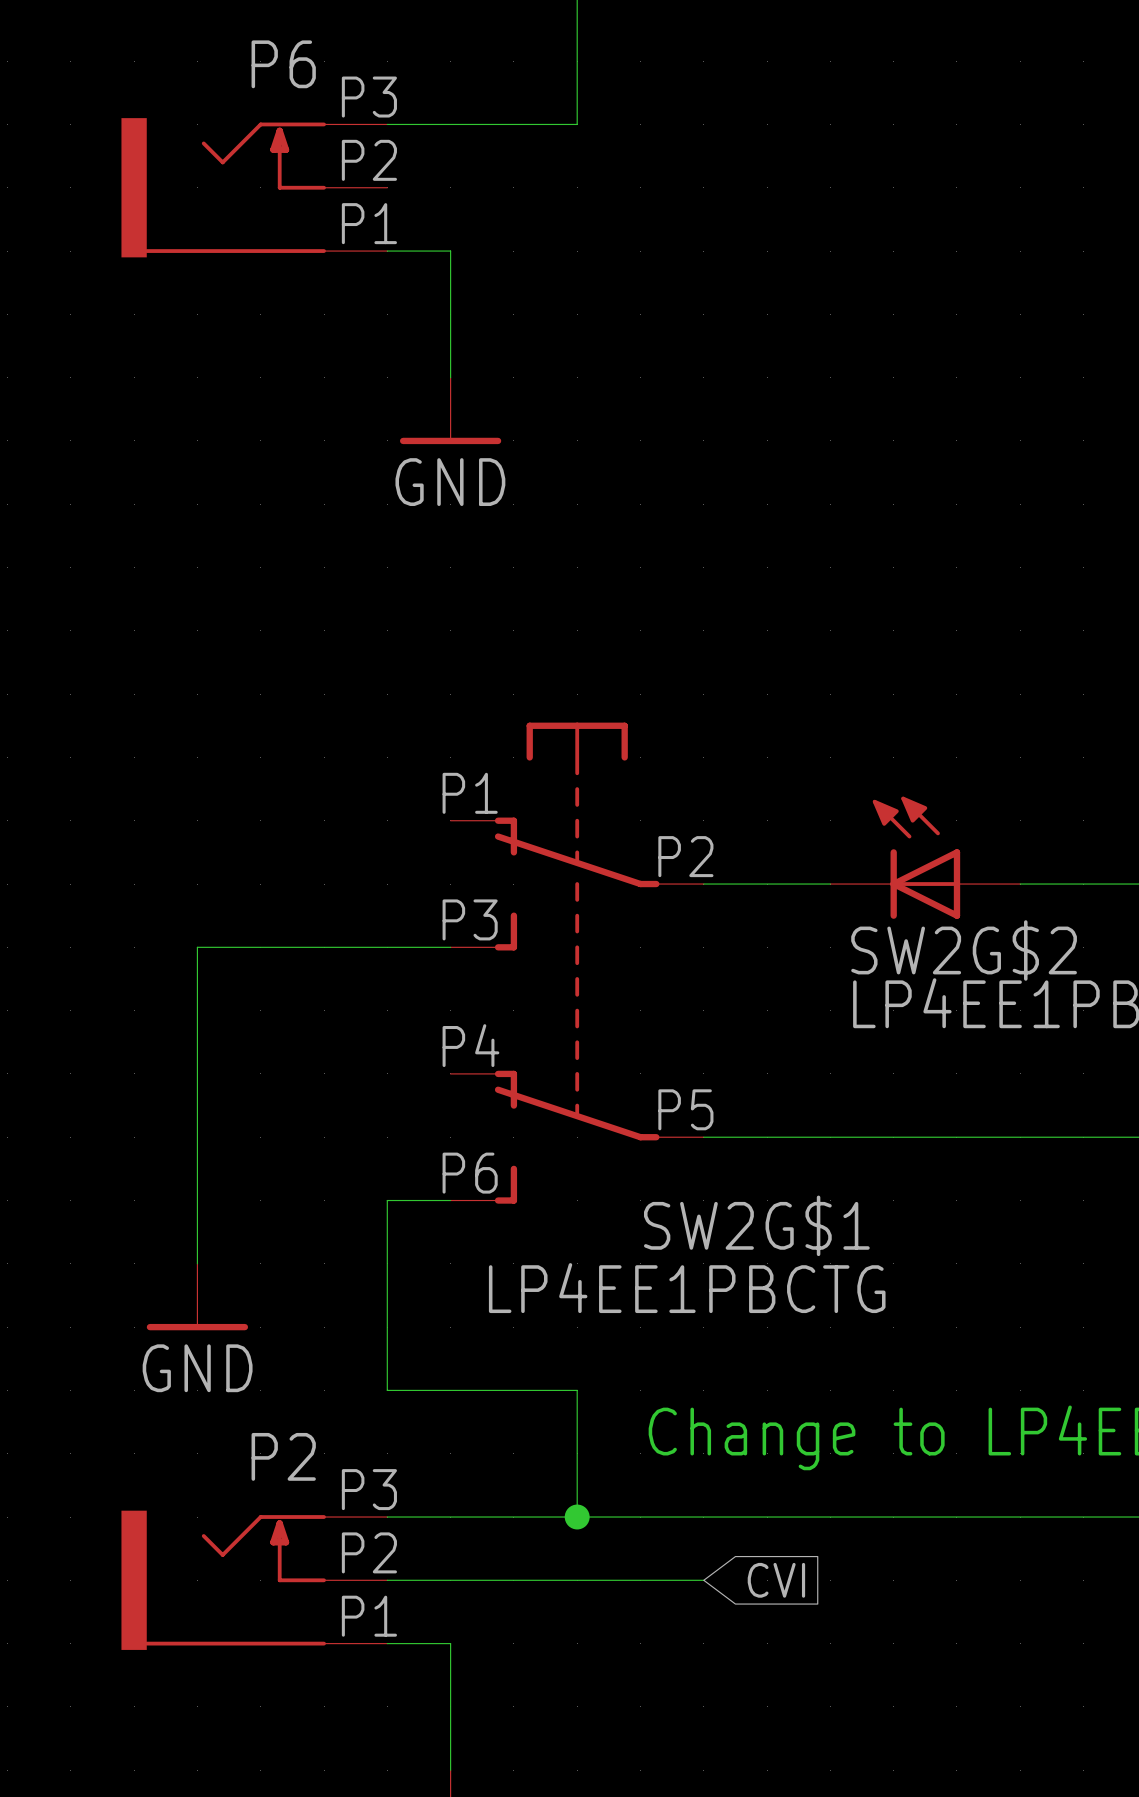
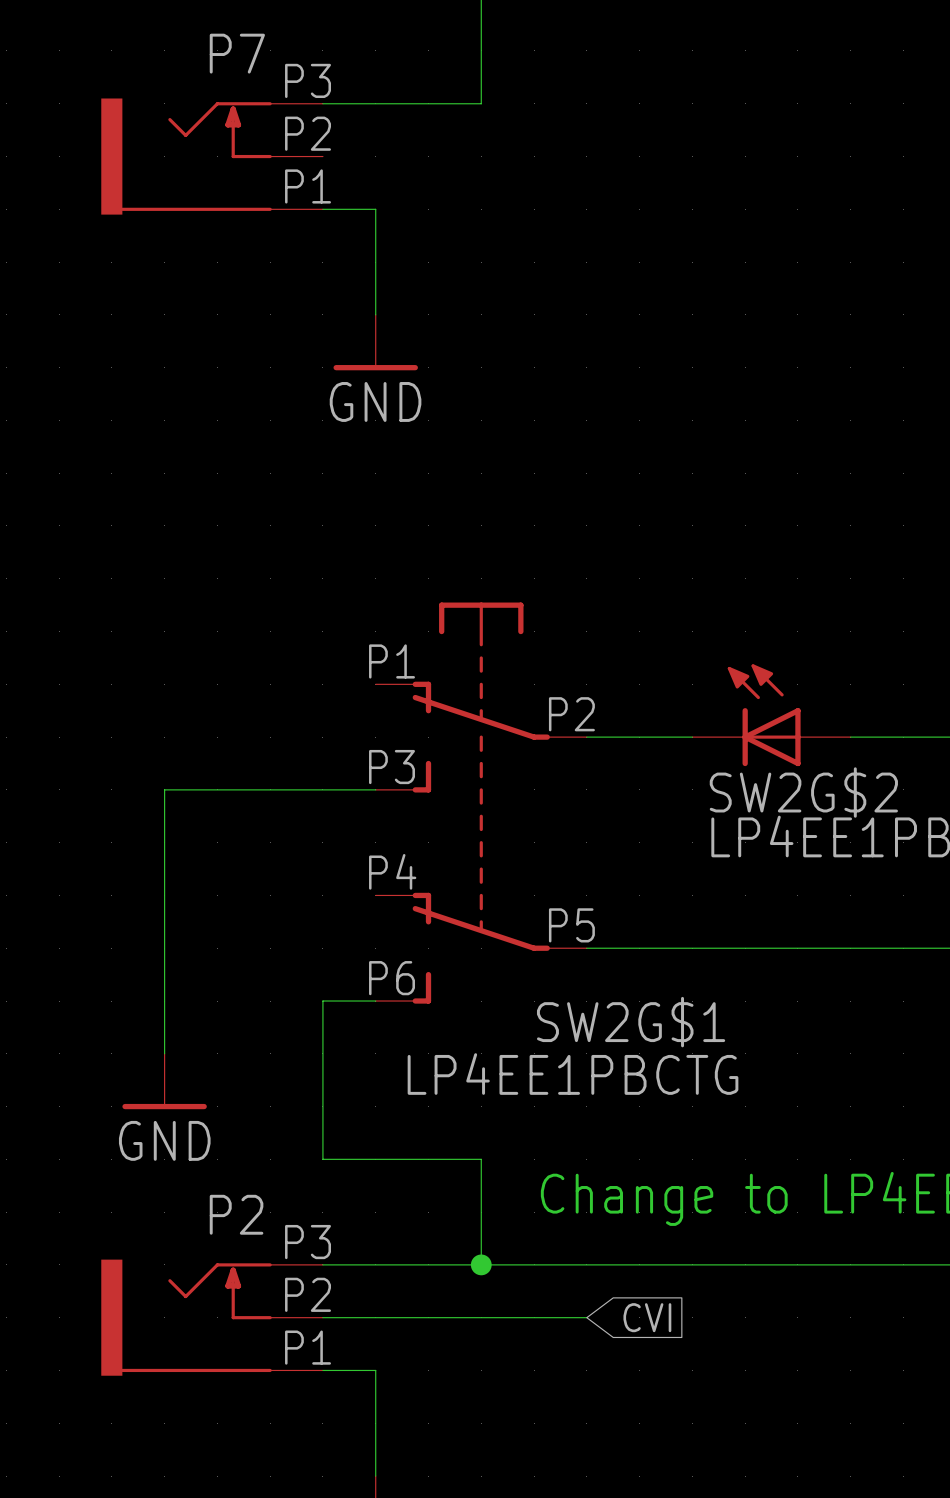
P6 name: P6 (283, 64) -> P7 (237, 53)

